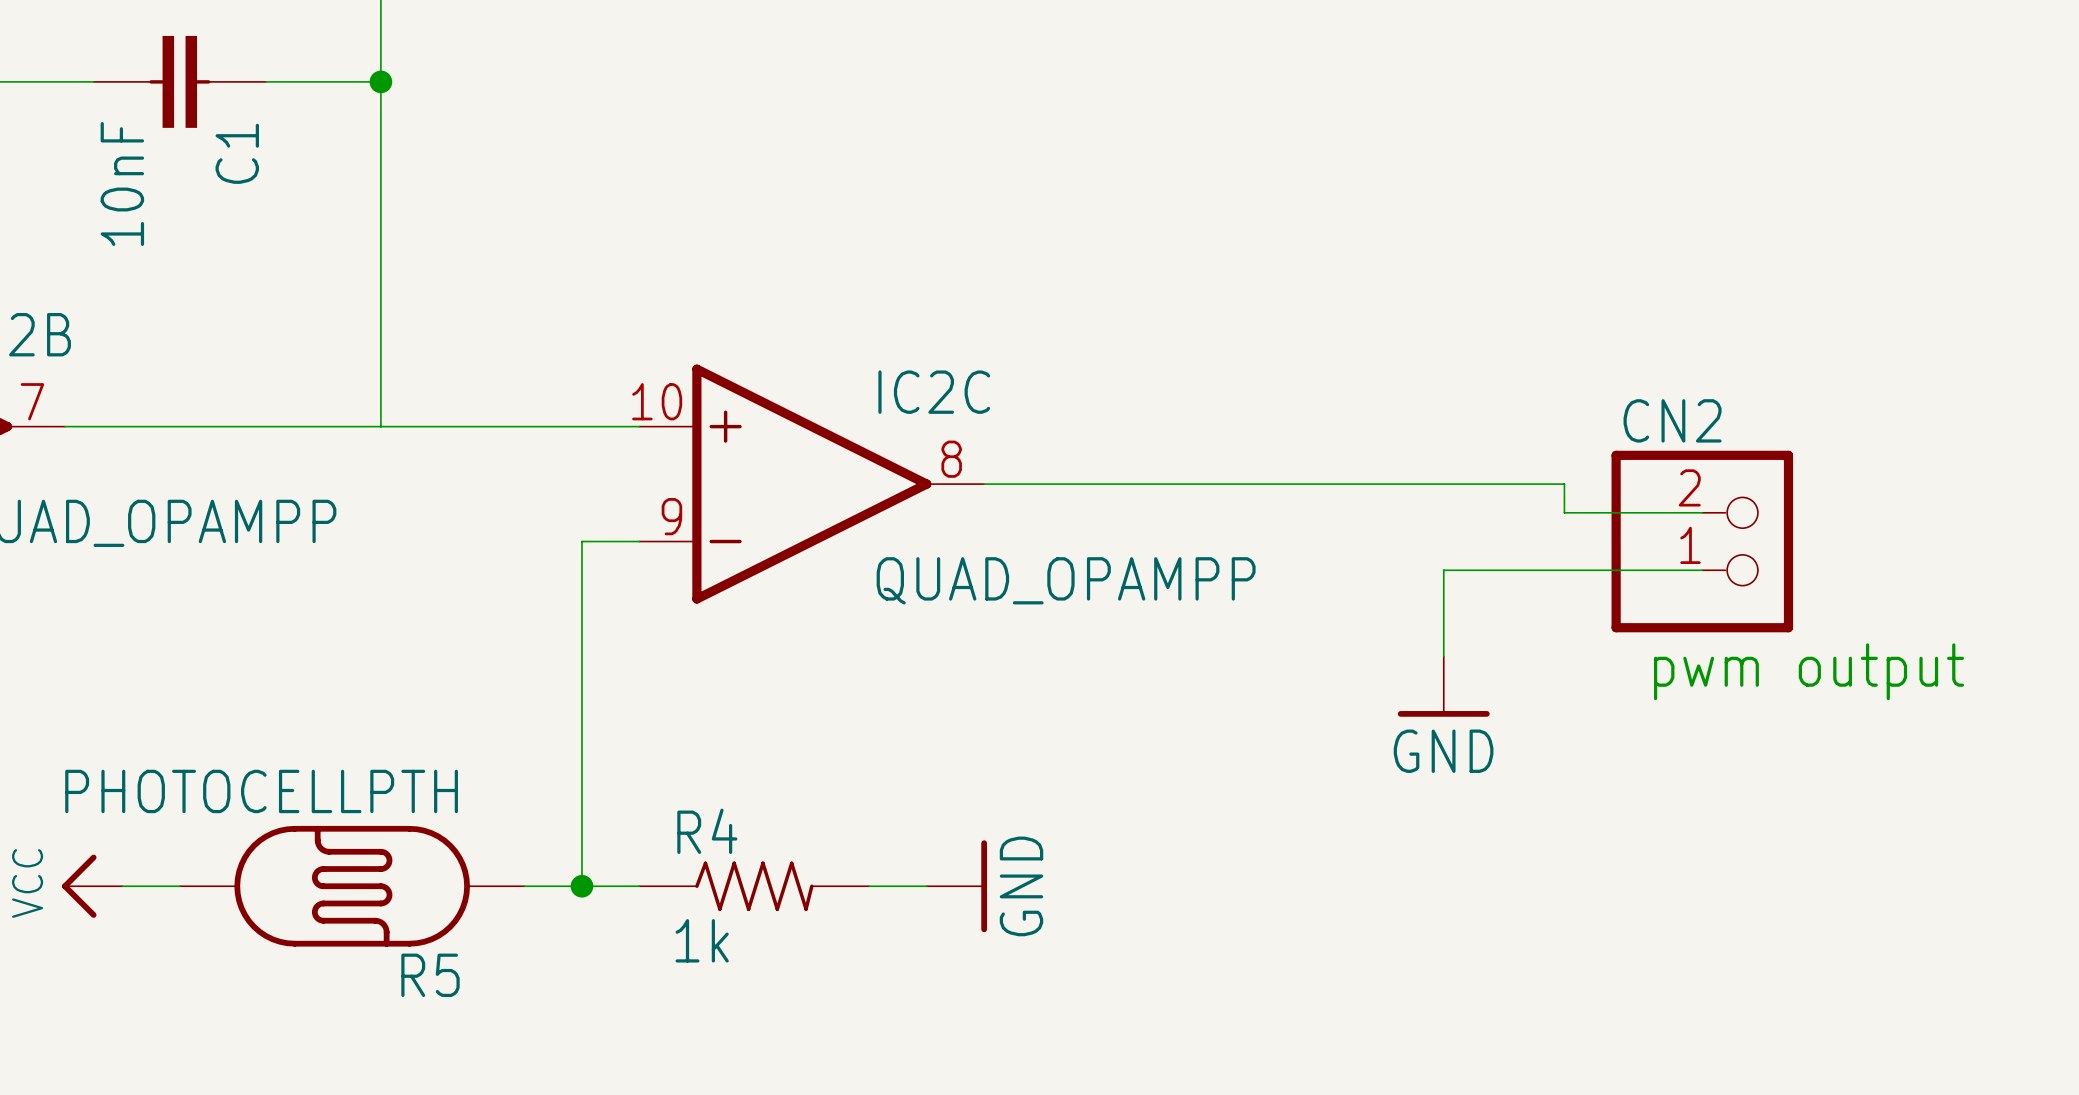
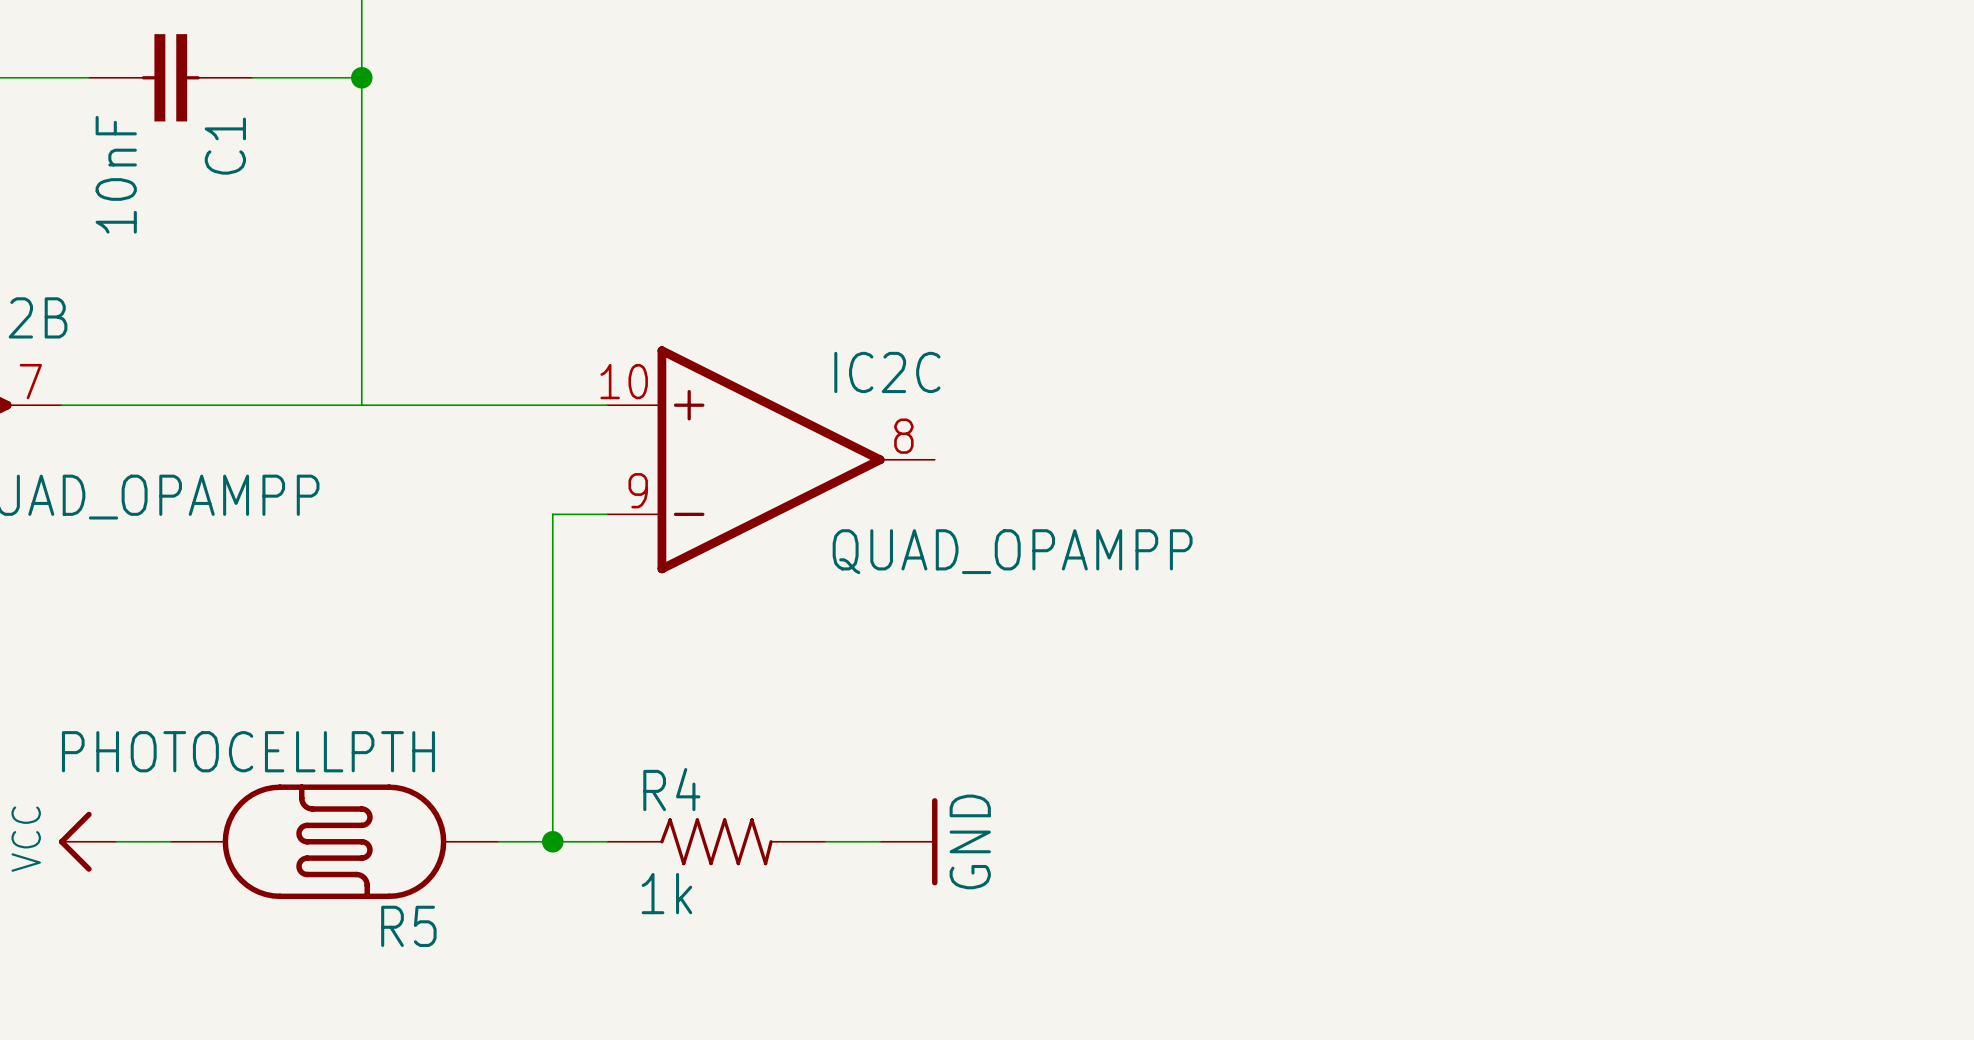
wire: (984, 484) (1564, 484) (1564, 512) (1702, 512) -> none
CN2: (1702, 541) -> none
wire: (1702, 570) (1443, 570) (1443, 656) -> none
text: pwm output (1808, 671) -> none
power symbol: GND (1443, 686) -> none

